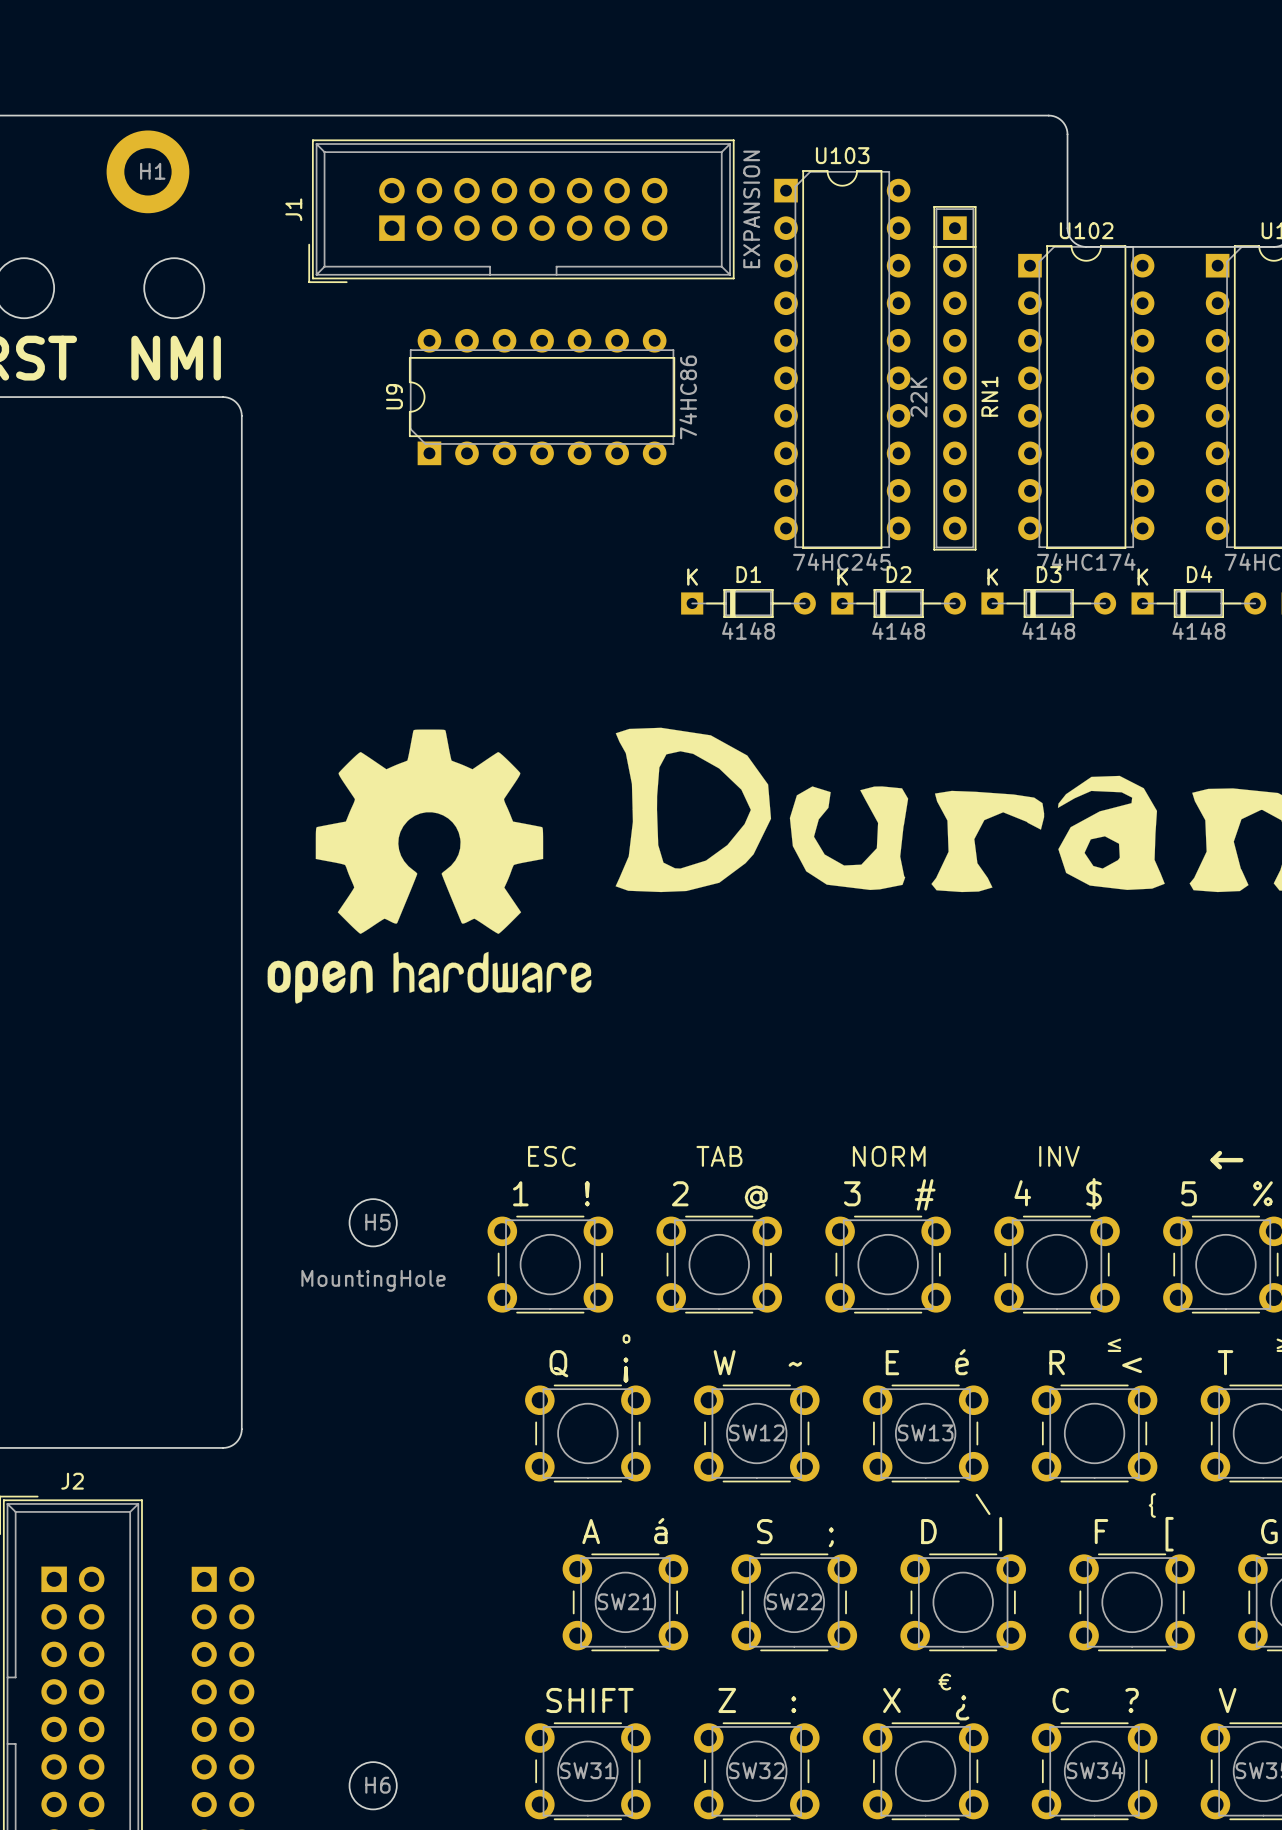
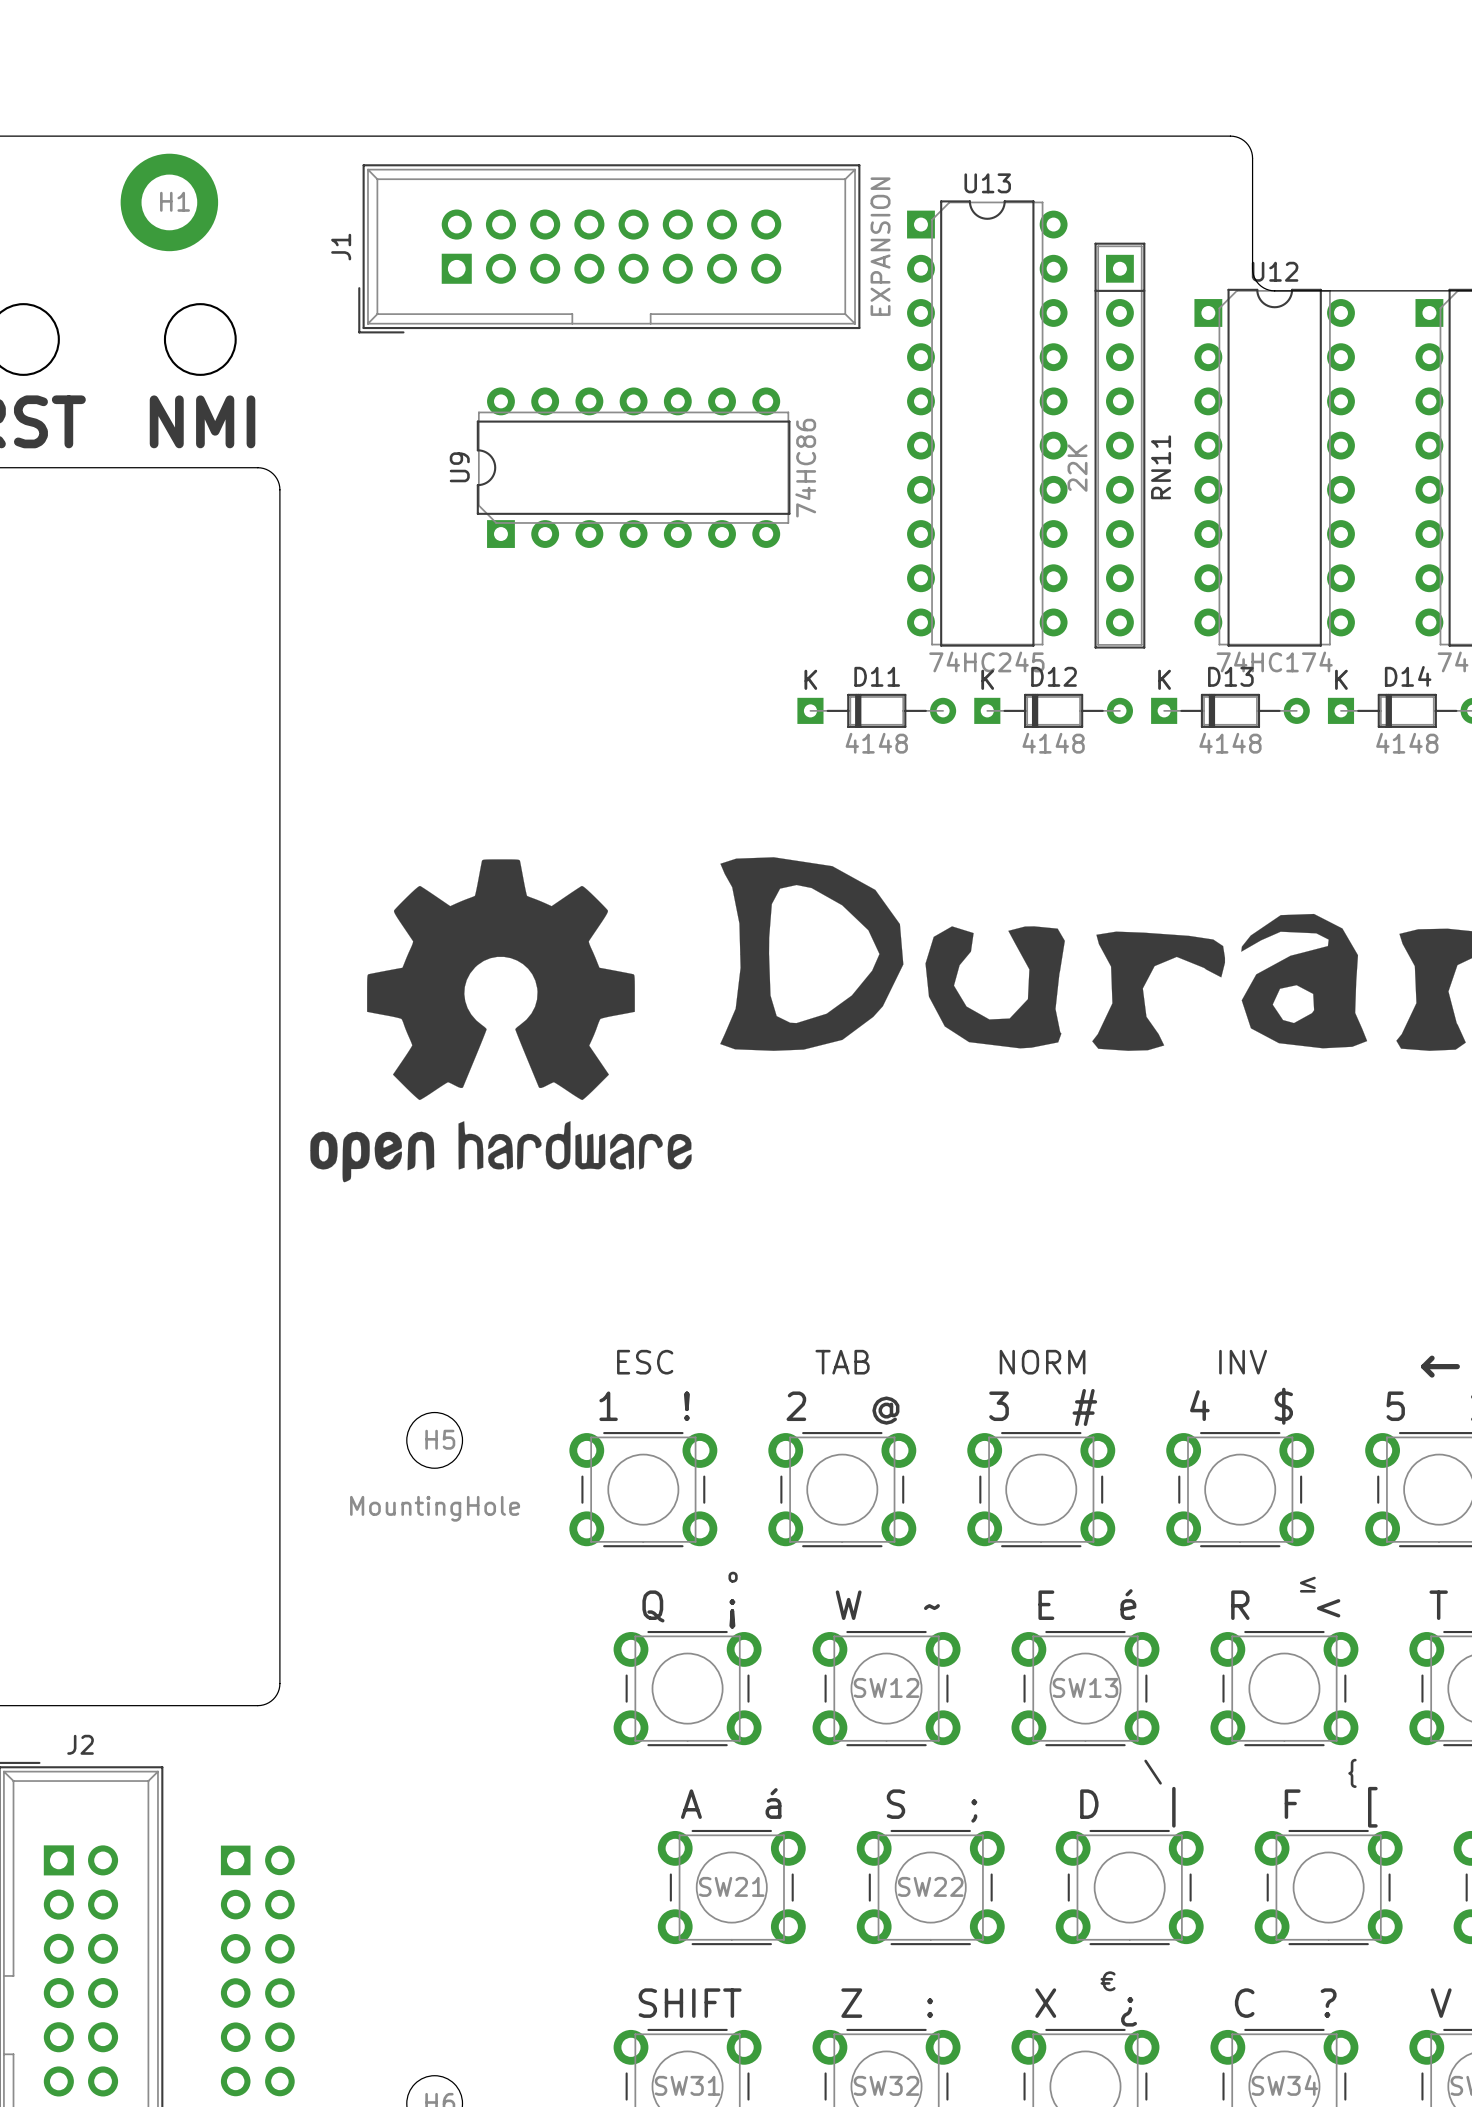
U103 name: U103 (842, 155) -> U13 (987, 183)
U102 name: U102 (1086, 230) -> U12 (1275, 271)
RN1 name: RN1 (989, 396) -> RN11 (1161, 467)
D1 name: D1 (748, 574) -> D11 (877, 676)
D2 name: D2 (898, 574) -> D12 (1054, 676)
D3 name: D3 (1049, 574) -> D13 (1230, 676)
D4 name: D4 (1199, 574) -> D14 (1408, 676)

